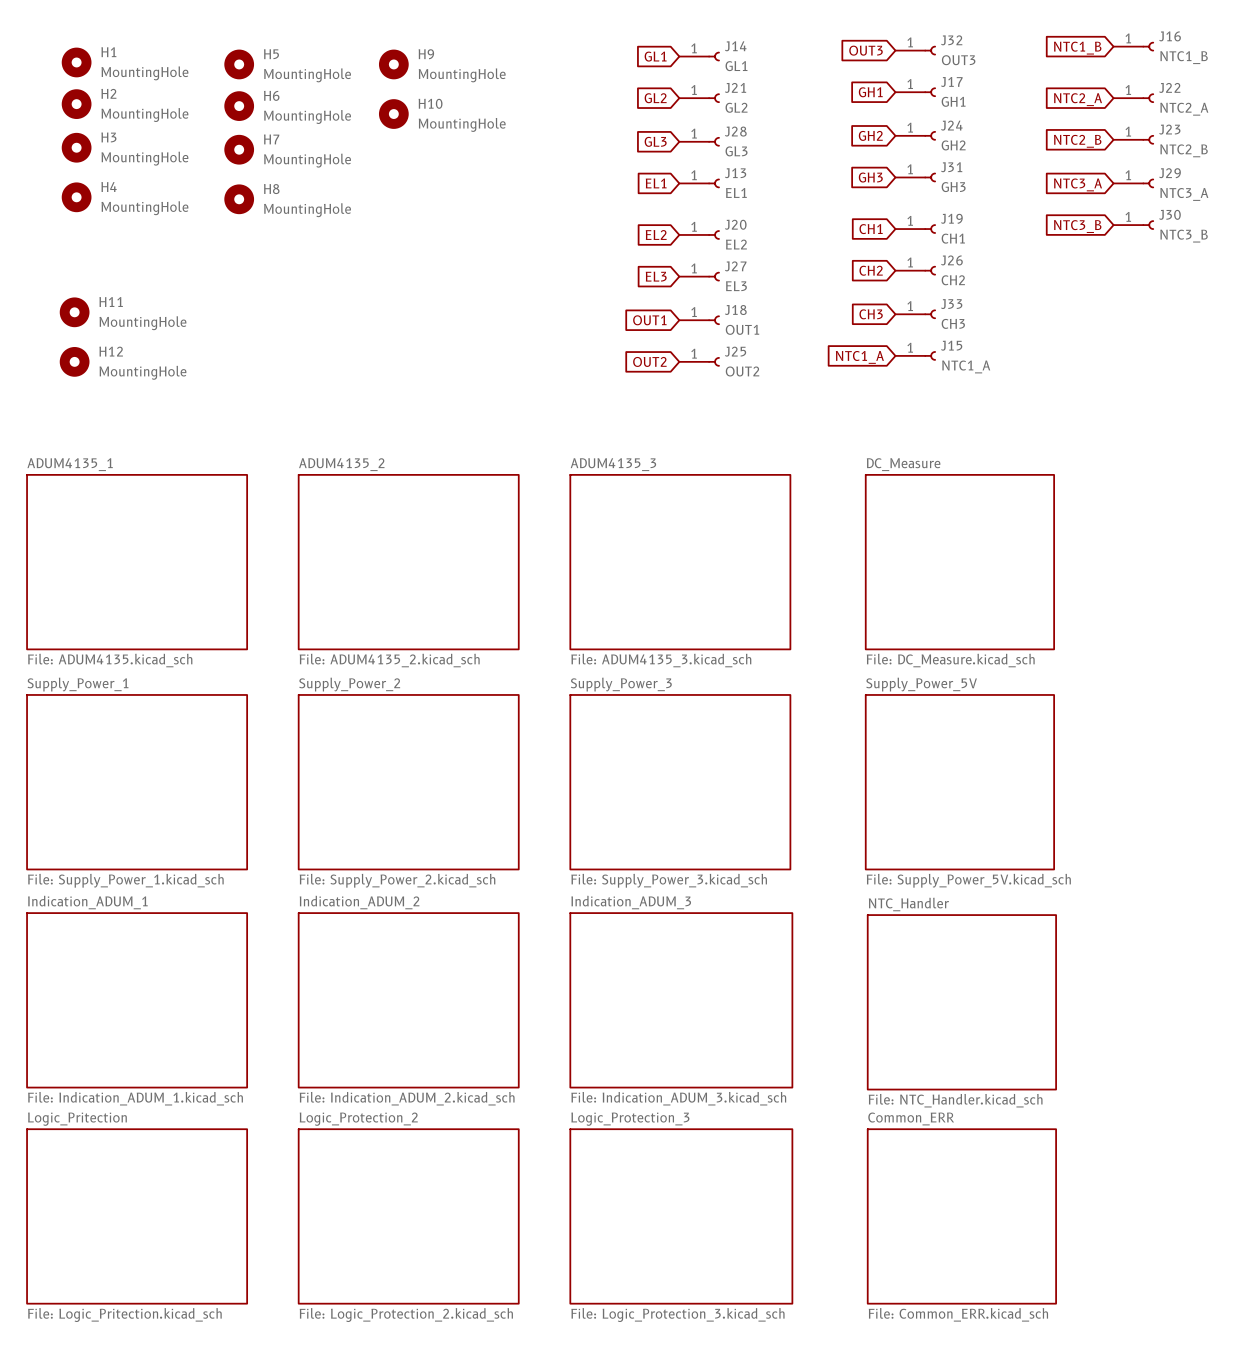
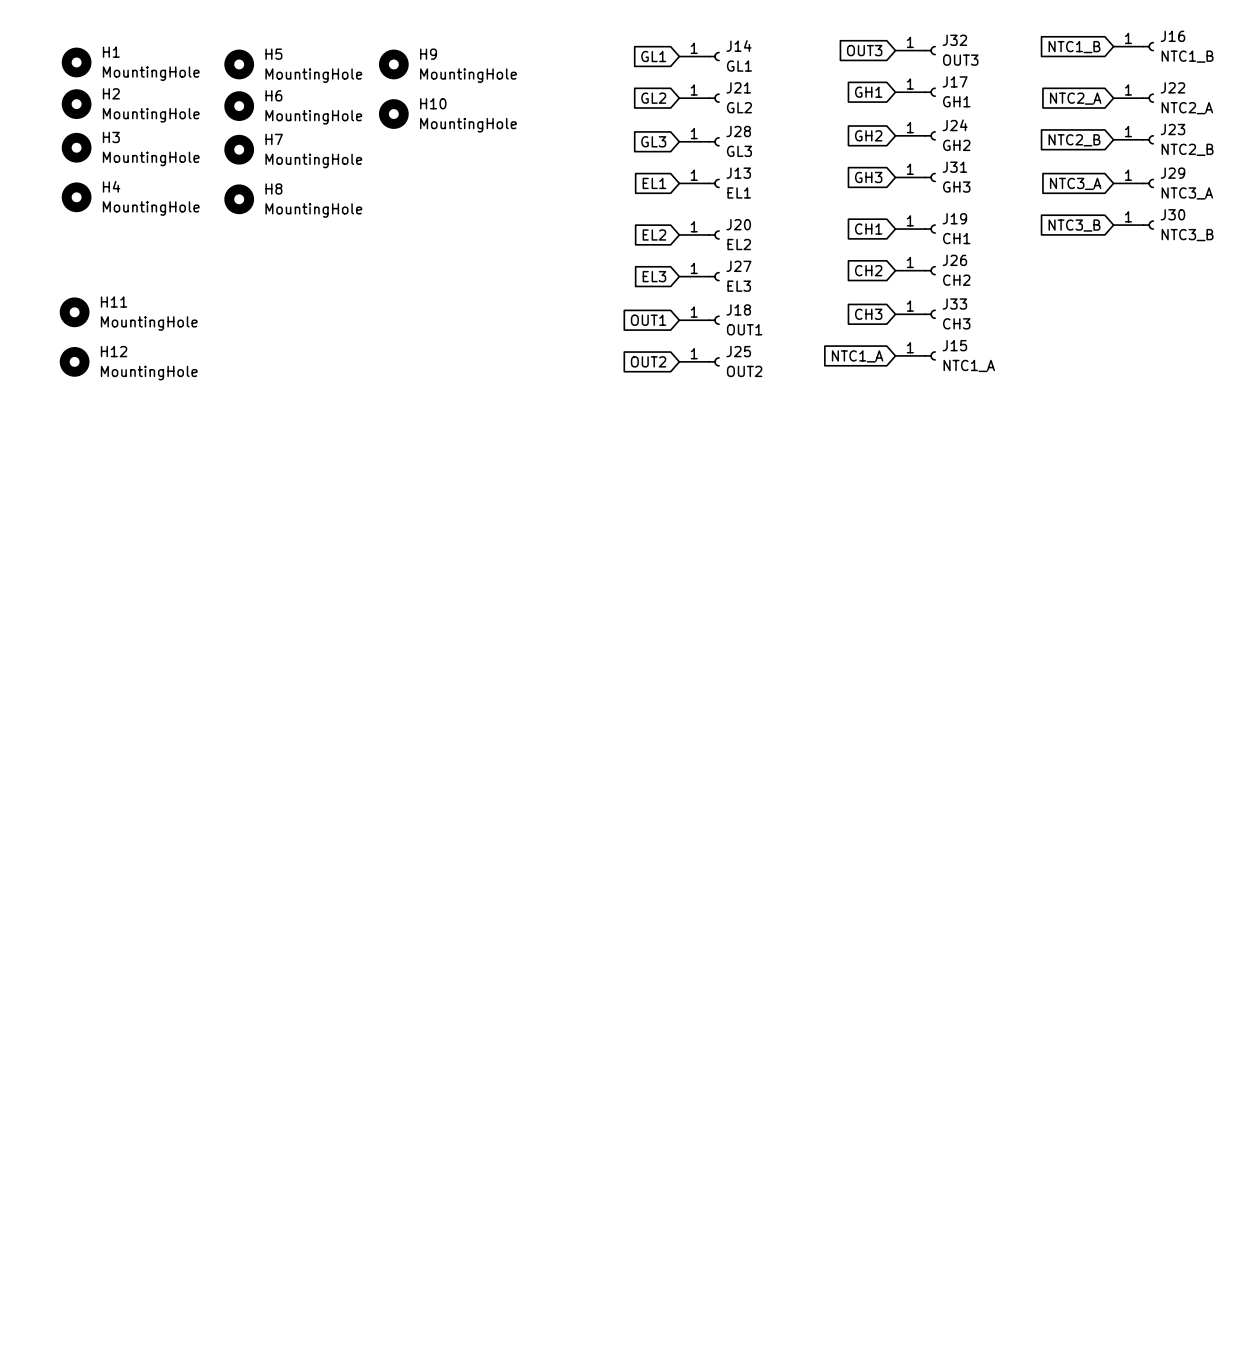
sheet ADUM4135_1: File: ADUM4135.kicad_sch (137, 562) -> none
sheet ADUM4135_2: File: ADUM4135_2.kicad_sch (408, 562) -> none
sheet ADUM4135_3: File: ADUM4135_3.kicad_sch (680, 562) -> none
sheet DC_Measure: File: DC_Measure.kicad_sch (959, 562) -> none
sheet Supply_Power_1: File: Supply_Power_1.kicad_sch (137, 782) -> none
sheet Supply_Power_2: File: Supply_Power_2.kicad_sch (408, 782) -> none
sheet Supply_Power_3: File: Supply_Power_3.kicad_sch (680, 782) -> none
sheet Supply_Power_5V: File: Supply_Power_5V.kicad_sch (959, 782) -> none
sheet Indication_ADUM_1: File: Indication_ADUM_1.kicad_sch (137, 1000) -> none
sheet Indication_ADUM_2: File: Indication_ADUM_2.kicad_sch (408, 1000) -> none
sheet Indication_ADUM_3: File: Indication_ADUM_3.kicad_sch (681, 1000) -> none
sheet NTC_Handler: File: NTC_Handler.kicad_sch (961, 1002) -> none
sheet Logic_Pritection: File: Logic_Pritection.kicad_sch (137, 1216) -> none
sheet Logic_Protection_2: File: Logic_Protection_2.kicad_sch (408, 1216) -> none
sheet Logic_Protection_3: File: Logic_Protection_3.kicad_sch (681, 1216) -> none
sheet Common_ERR: File: Common_ERR.kicad_sch (961, 1216) -> none

